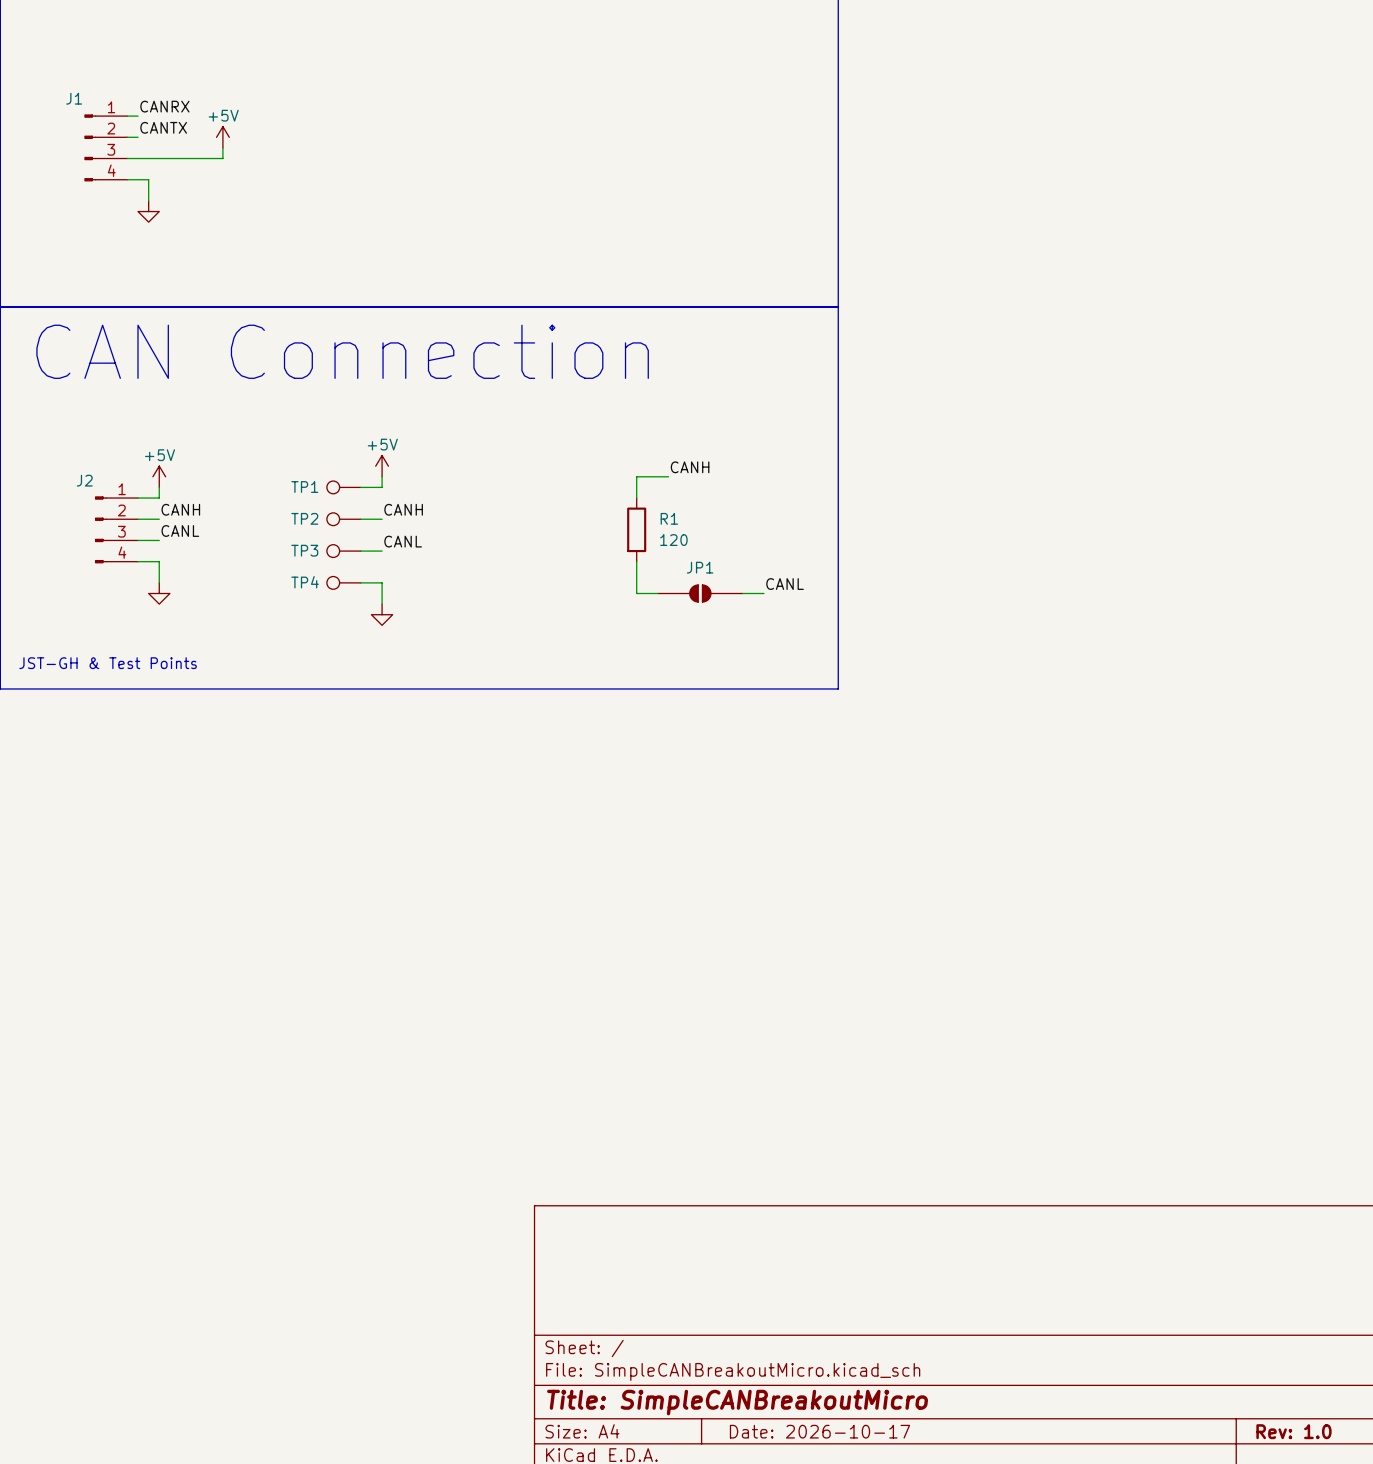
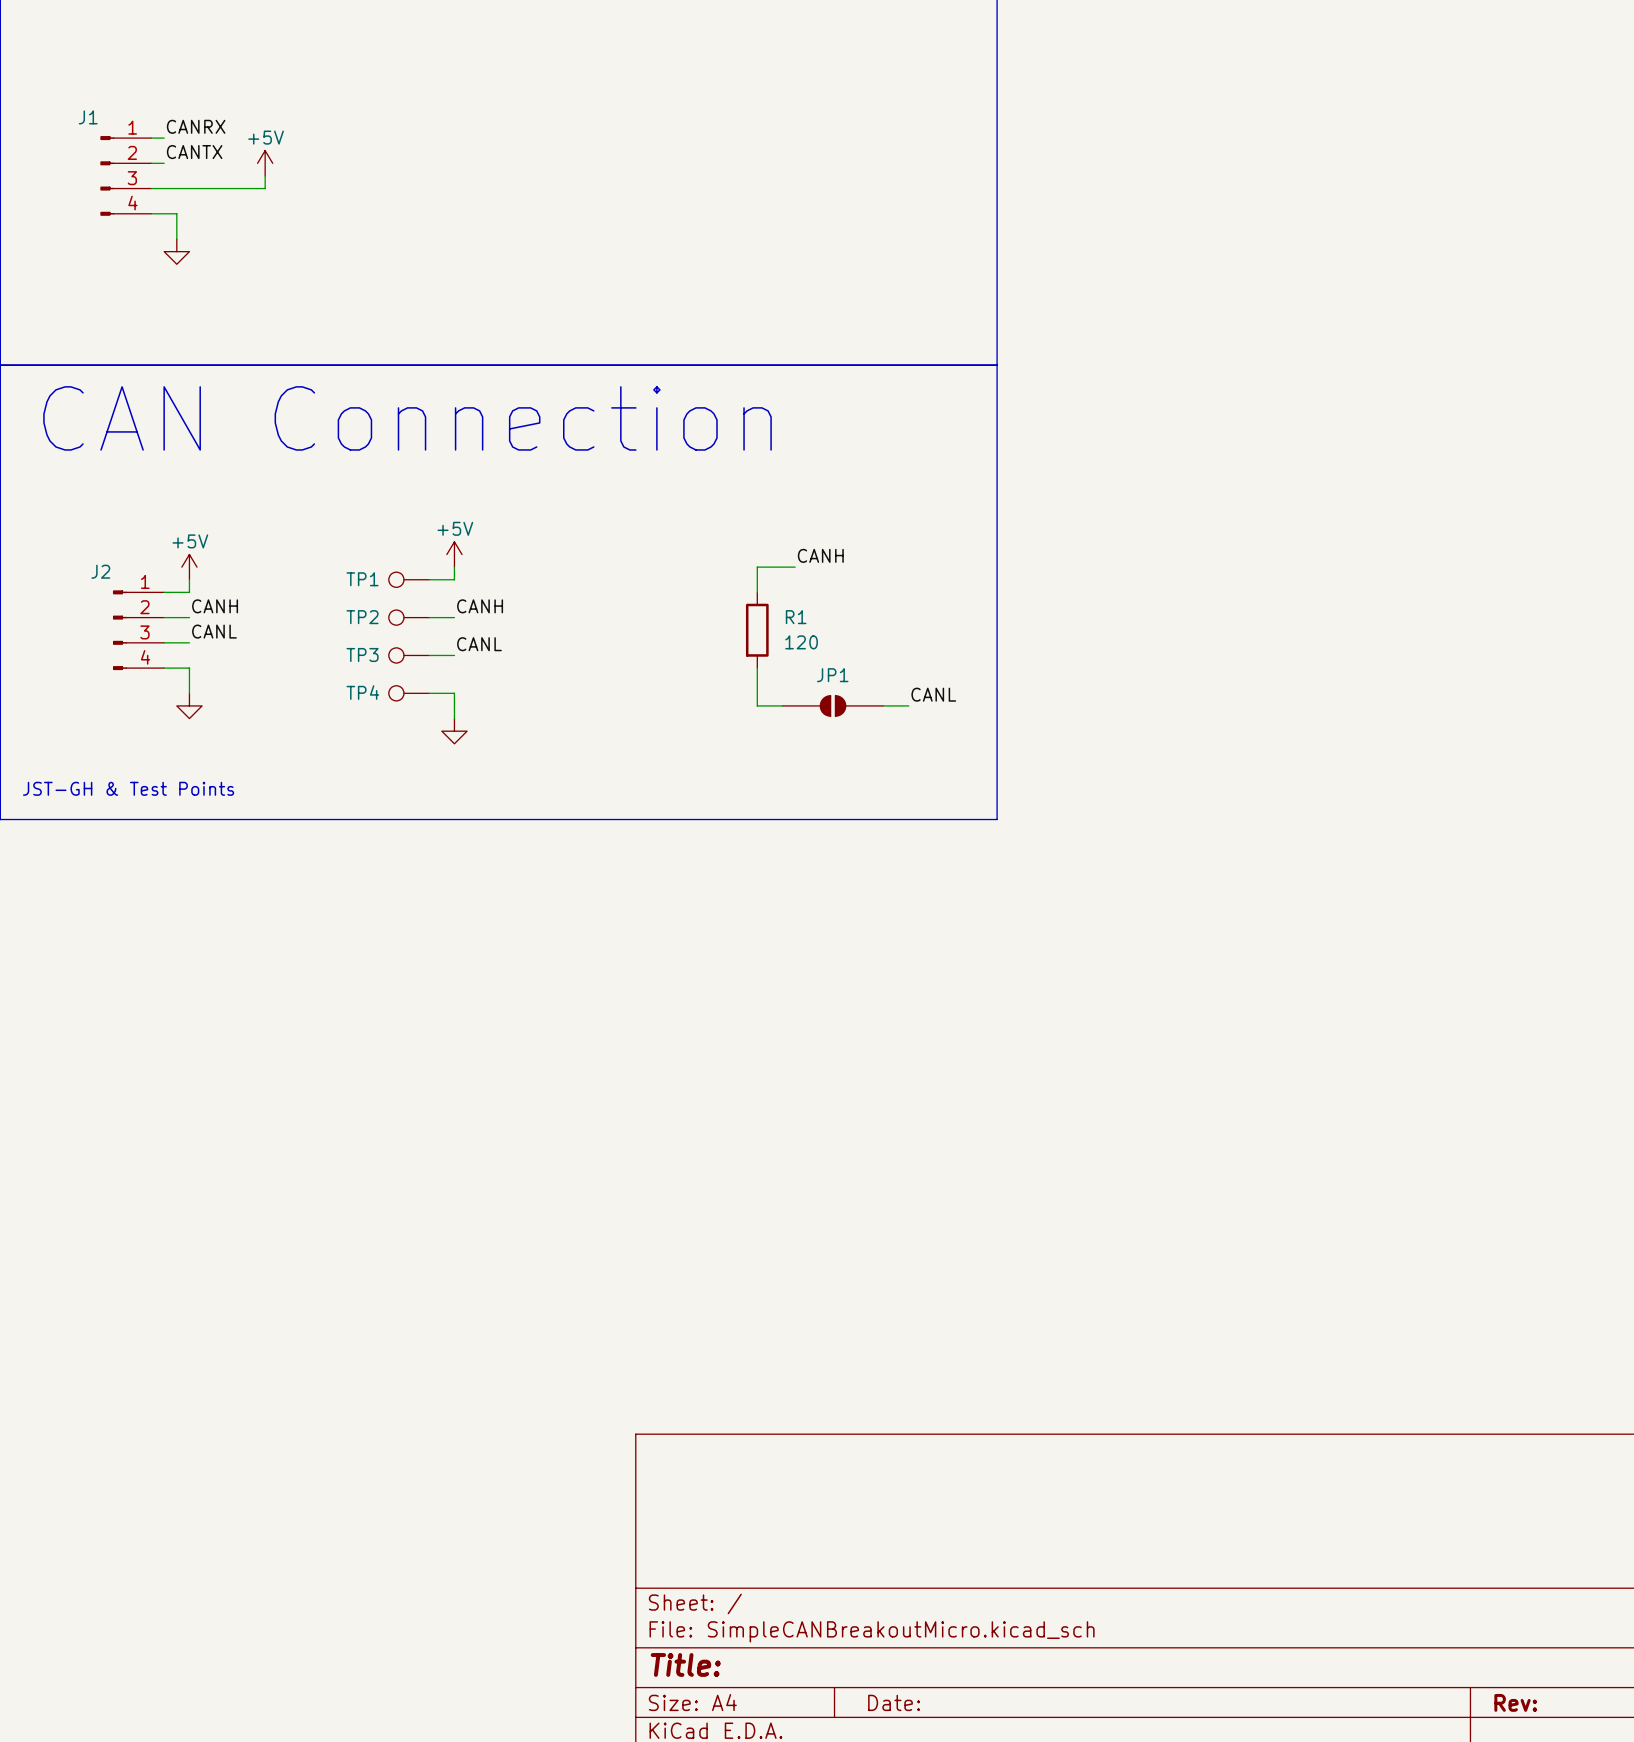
title block: Title: SimpleCANBreakoutMicro (737, 1402) -> Title: (685, 1664)
title block: Date: 2026-10-17 (819, 1431) -> Date: (894, 1702)
title block: Rev: 1.0 (1293, 1431) -> Rev: (1515, 1702)

